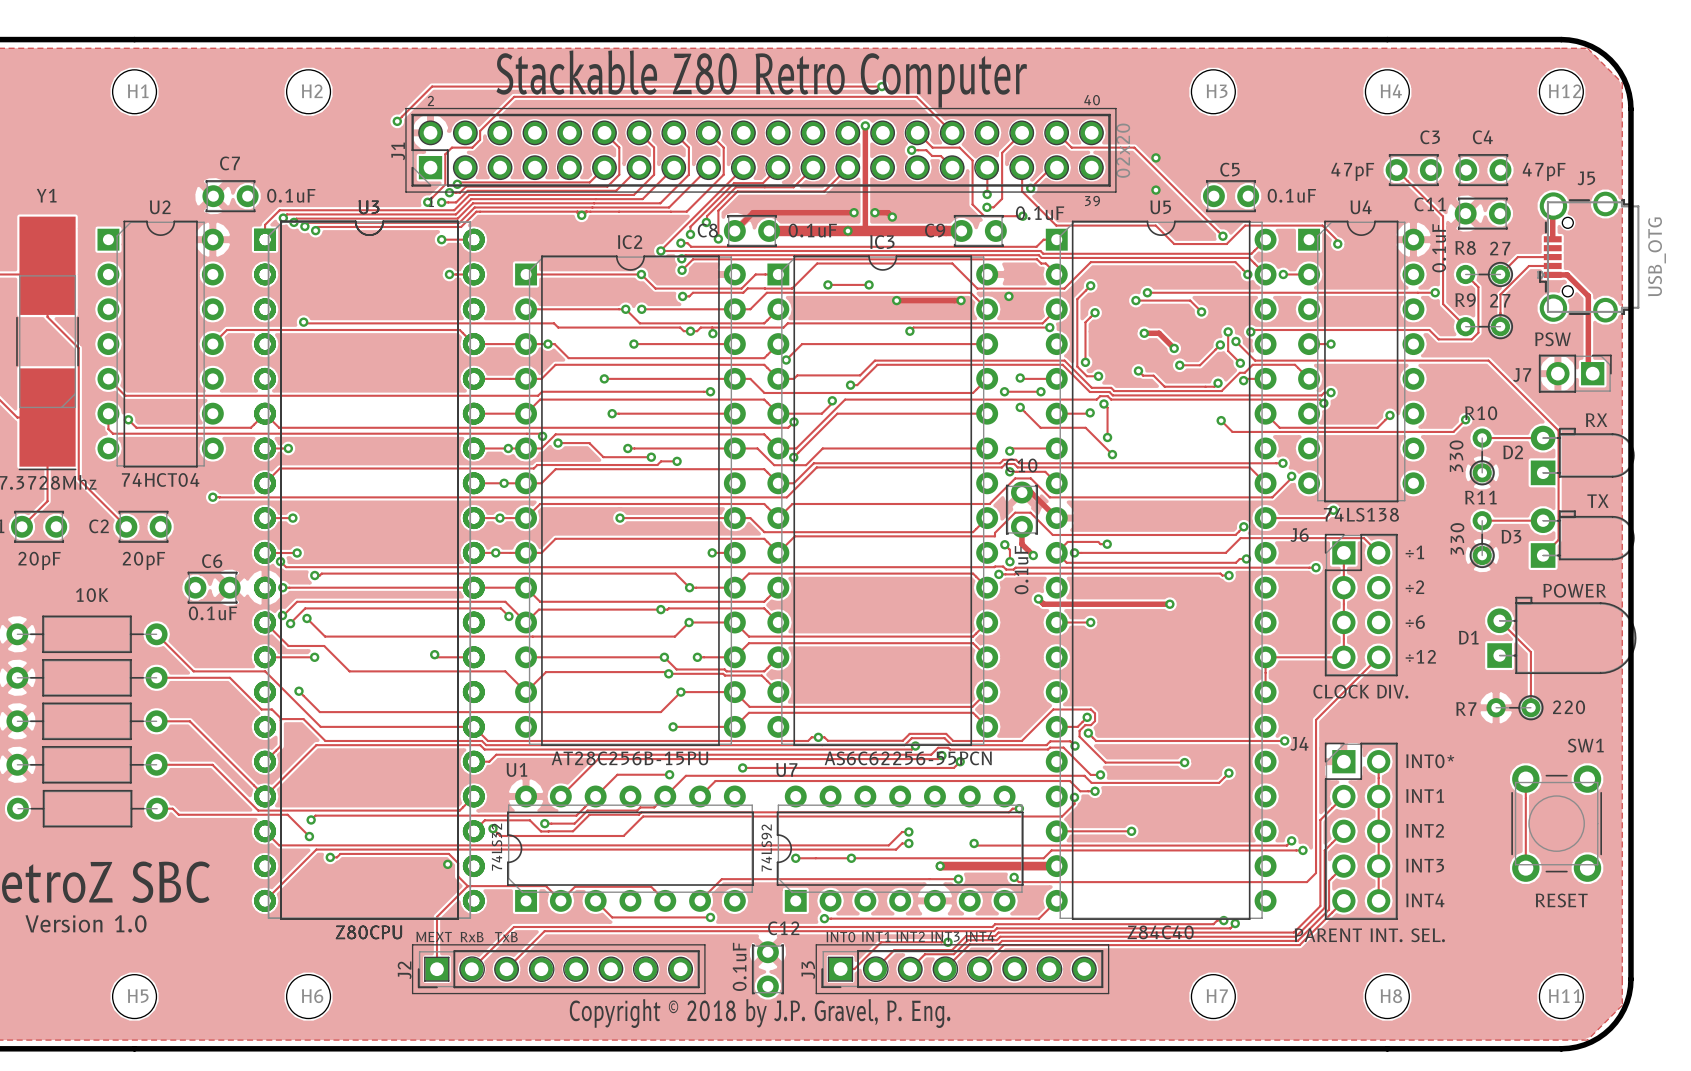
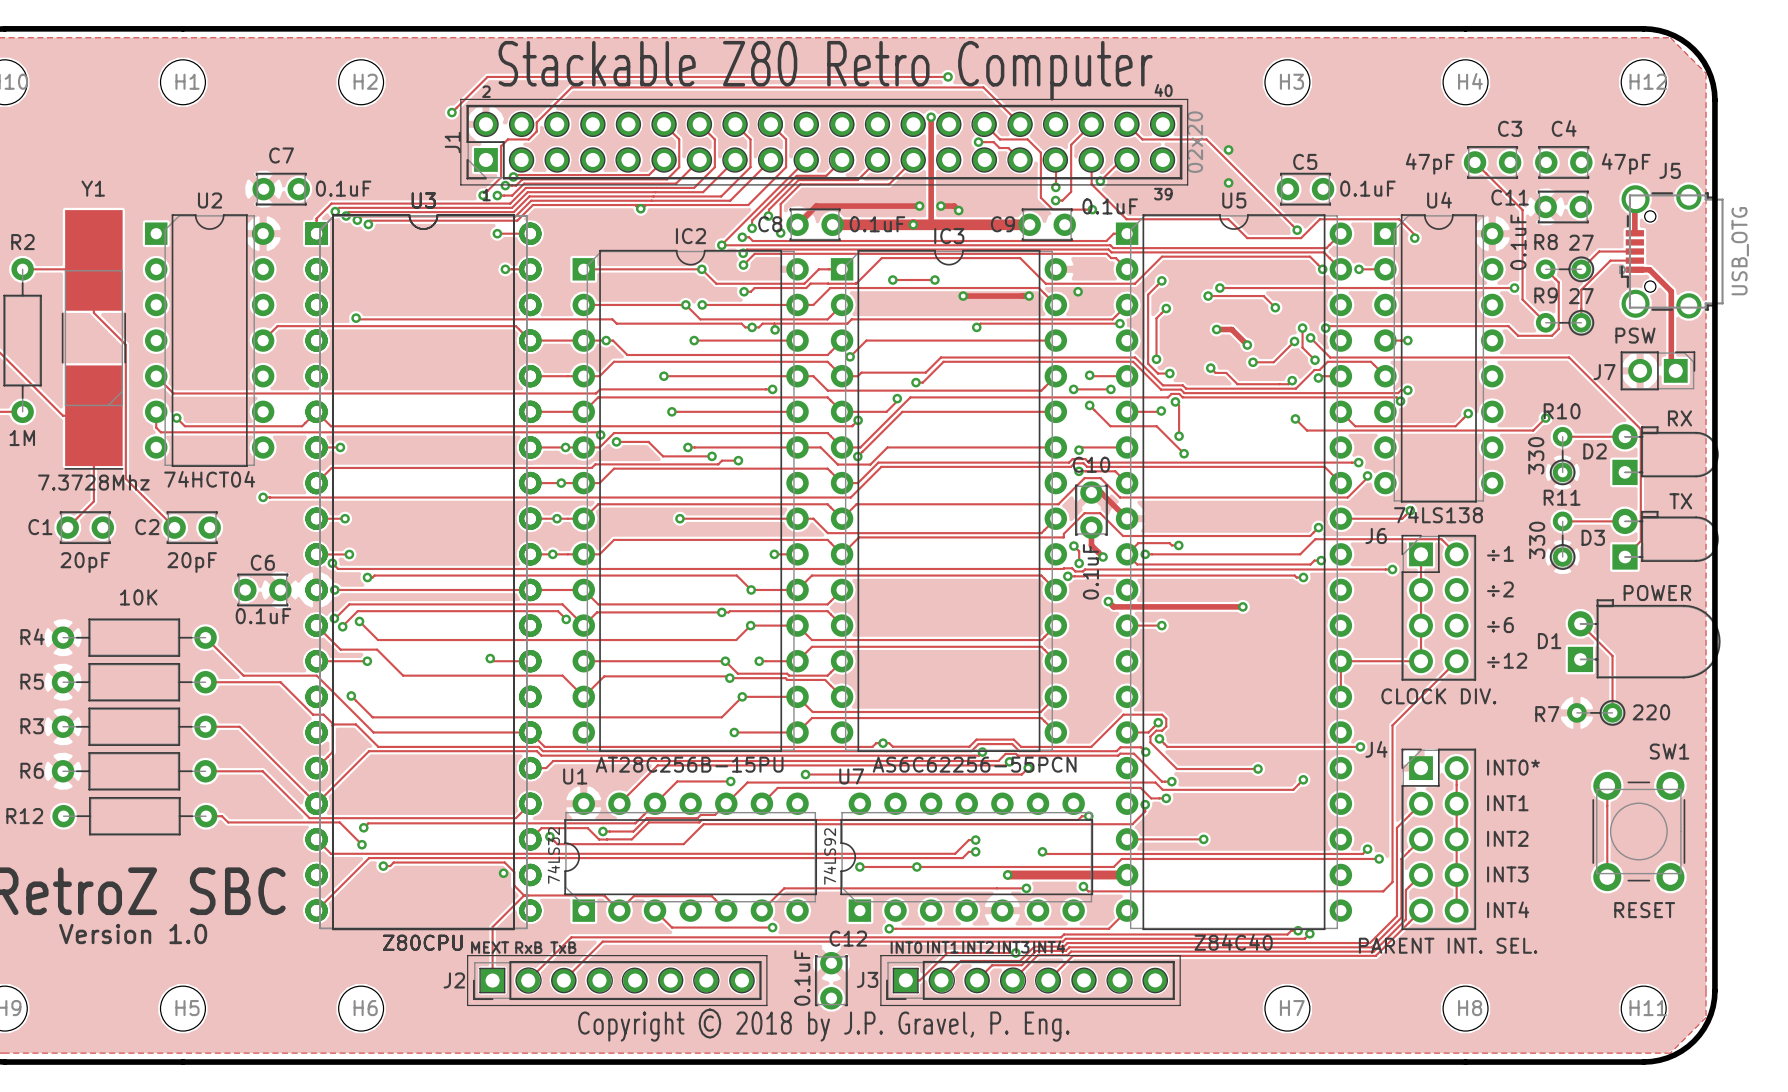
J2 name rotation: 0° (404, 970) -> 90° clockwise (454, 980)
J3 name rotation: 0° (808, 970) -> 90° clockwise (867, 979)

